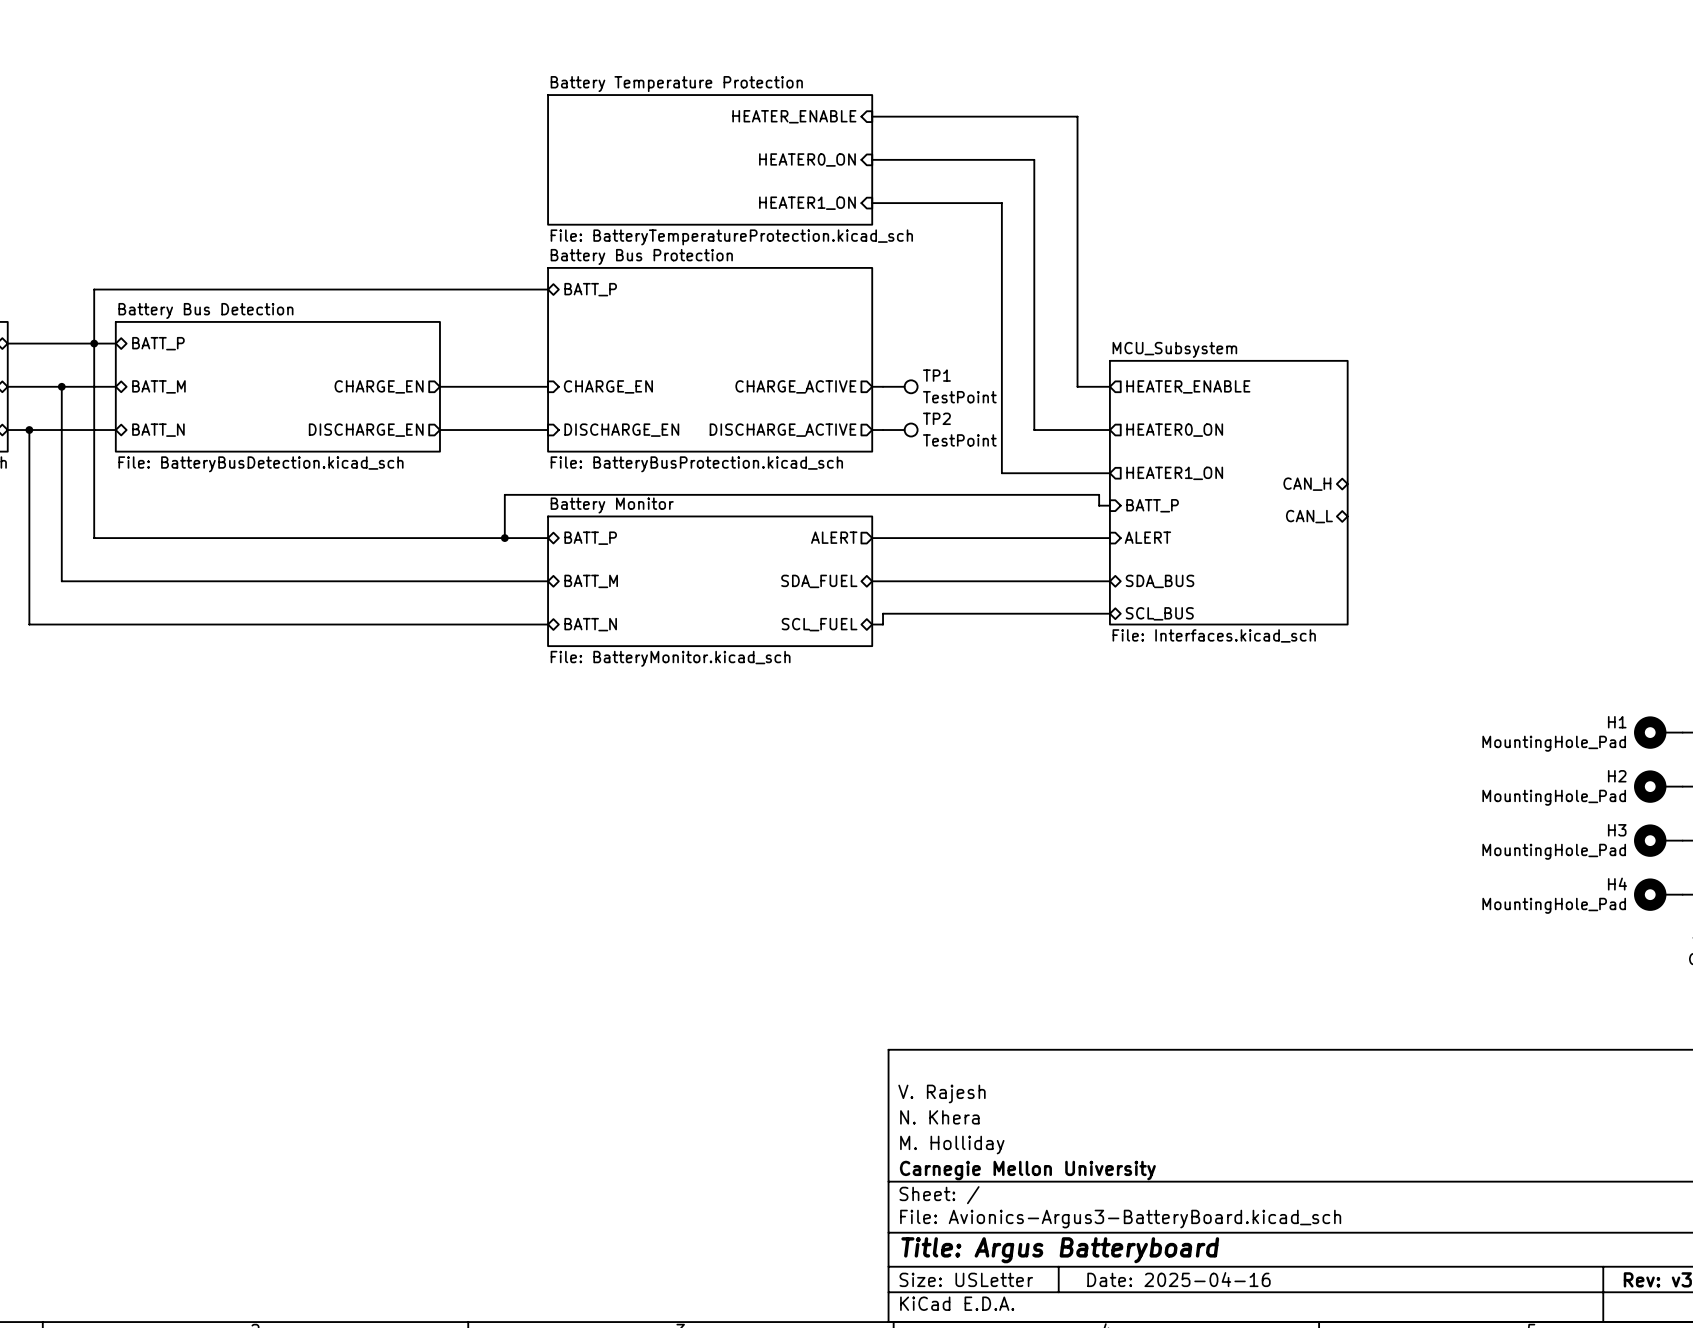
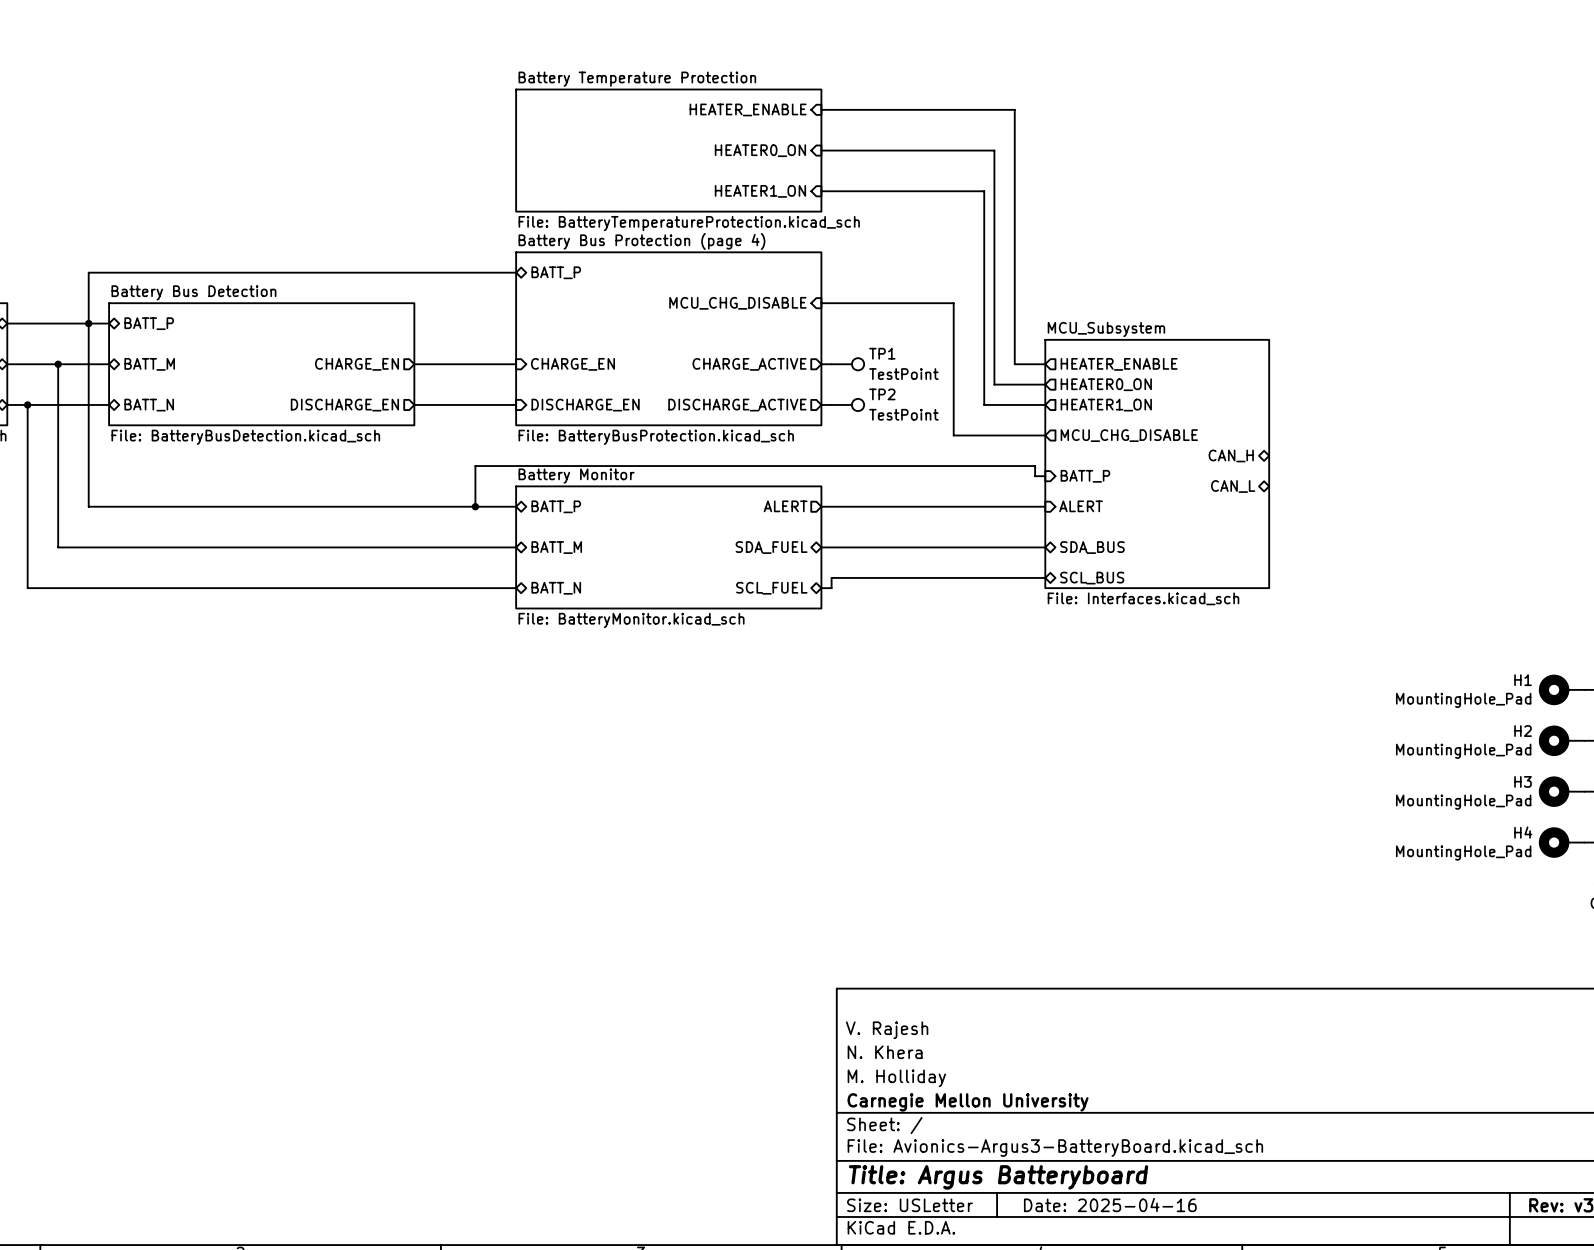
wire: (1034, 159) (1034, 430) (1045, 430) -> (943, 191) (984, 191) (984, 404)
wire: none -> (974, 150) (994, 150) (994, 384) (1045, 384)
wire: (1001, 203) (1001, 473) (1109, 473) -> none
sheet Battery Bus Protection name: Battery Bus Protection (641, 256) -> Battery Bus Protection (page 4) (641, 241)
wire: none -> (821, 303) (953, 303) (953, 435) (1045, 435)
sheet pin: none -> MCU_CHG_DISABLE (737, 303)
sheet pin: none -> HEATER0_ON (1106, 384)
sheet pin: HEATER0_ON (1174, 430) -> HEATER1_ON (1106, 405)
sheet pin: none -> MCU_CHG_DISABLE (1129, 435)
sheet pin: HEATER1_ON (1174, 473) -> none

